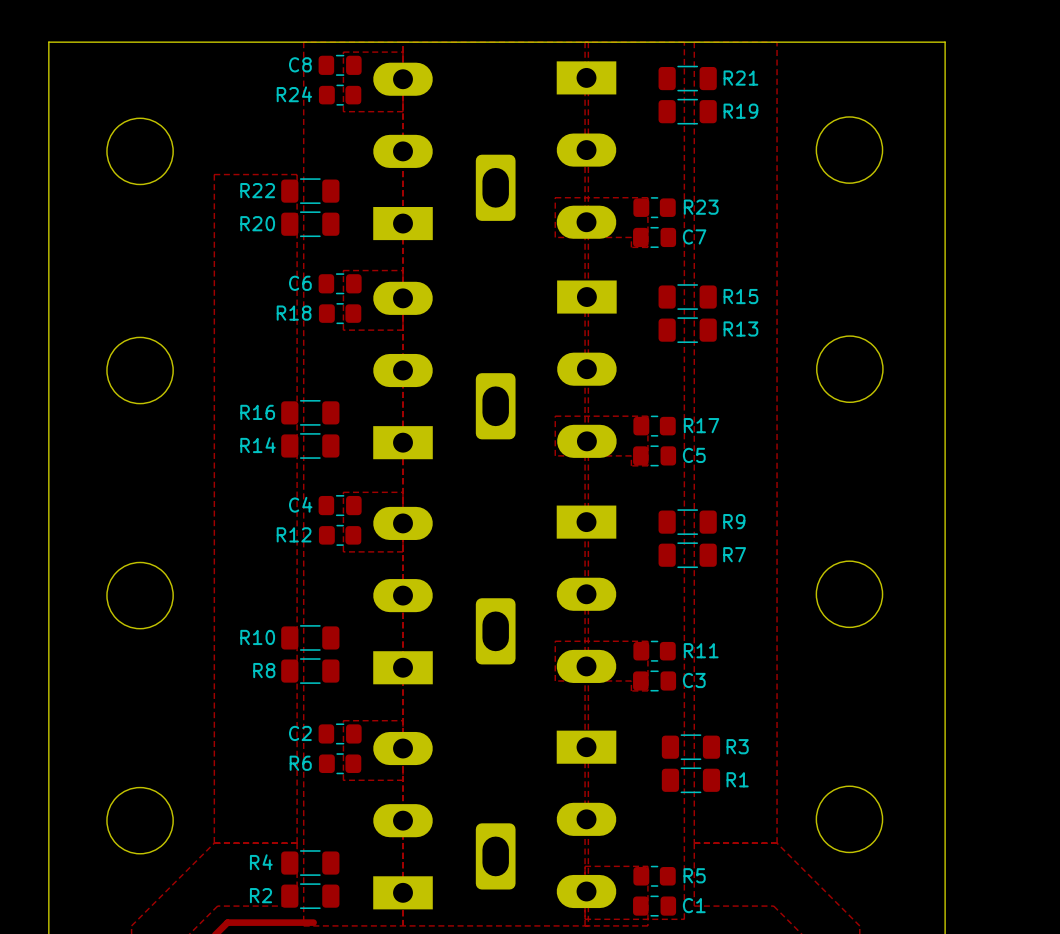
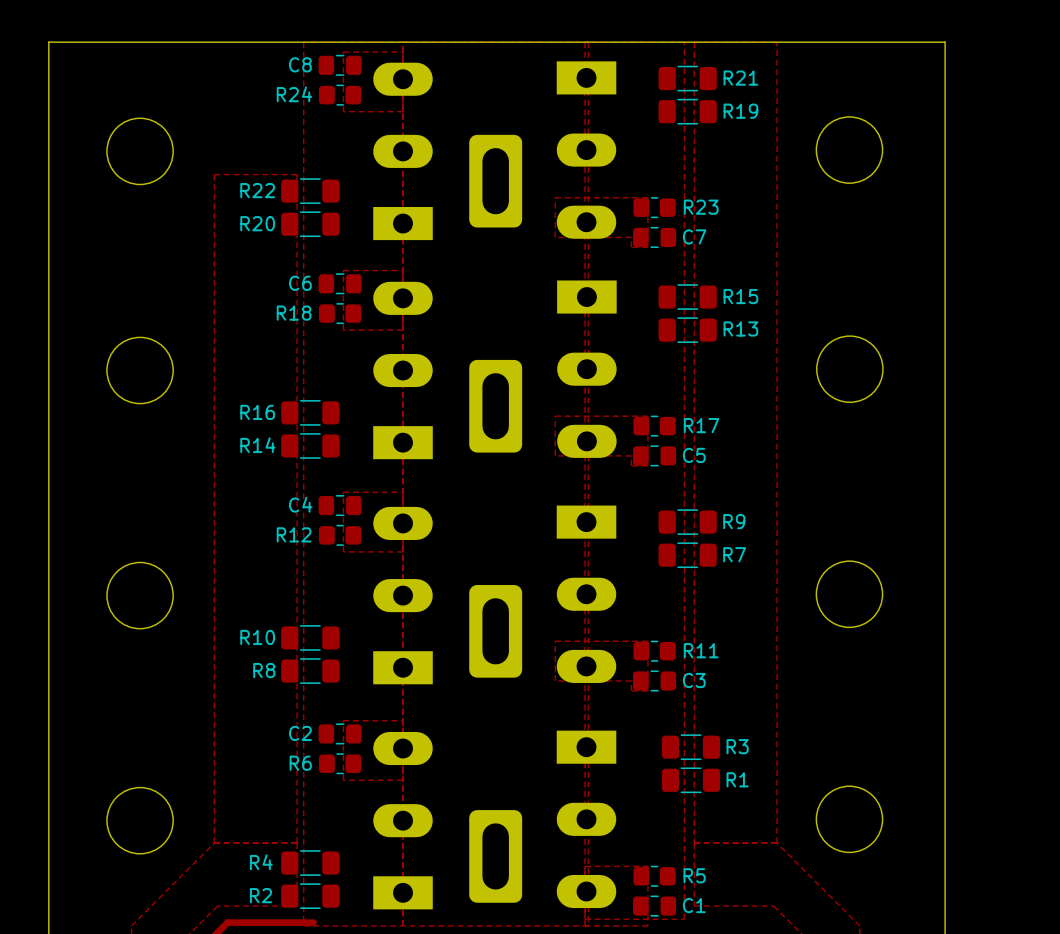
part footprint: [475, 154, 516, 221] -> [469, 134, 523, 228]
part footprint: [475, 373, 516, 440] -> [469, 359, 523, 453]
part footprint: [475, 598, 516, 665] -> [469, 585, 523, 678]
part footprint: [475, 823, 516, 890] -> [469, 810, 523, 903]

